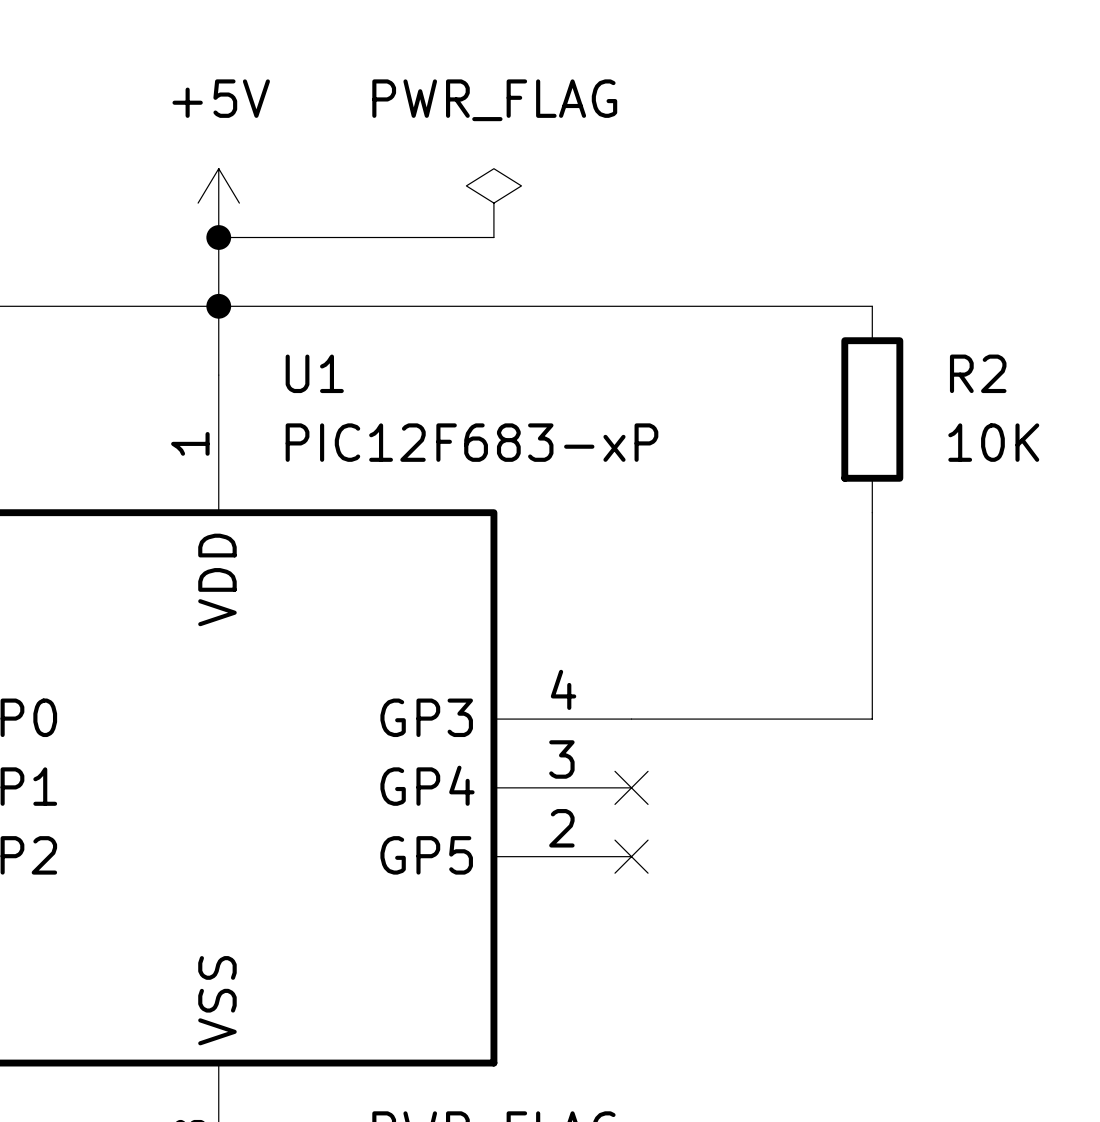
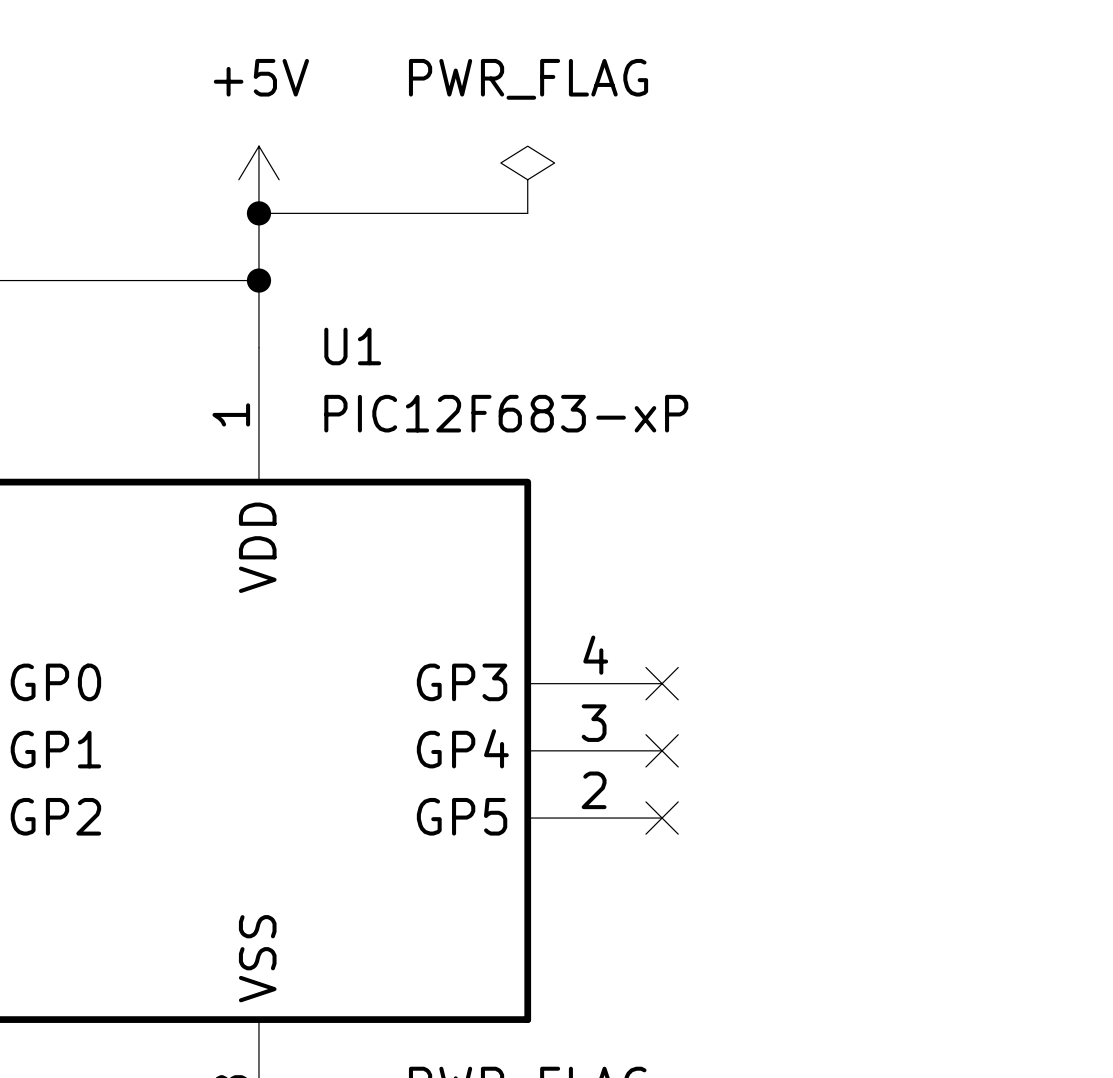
wire: (218, 306) (872, 306) -> none
R2: 10K (872, 409) -> none
wire: (872, 512) (872, 719) (631, 719) -> none
no-connect mark: none -> (662, 683)

